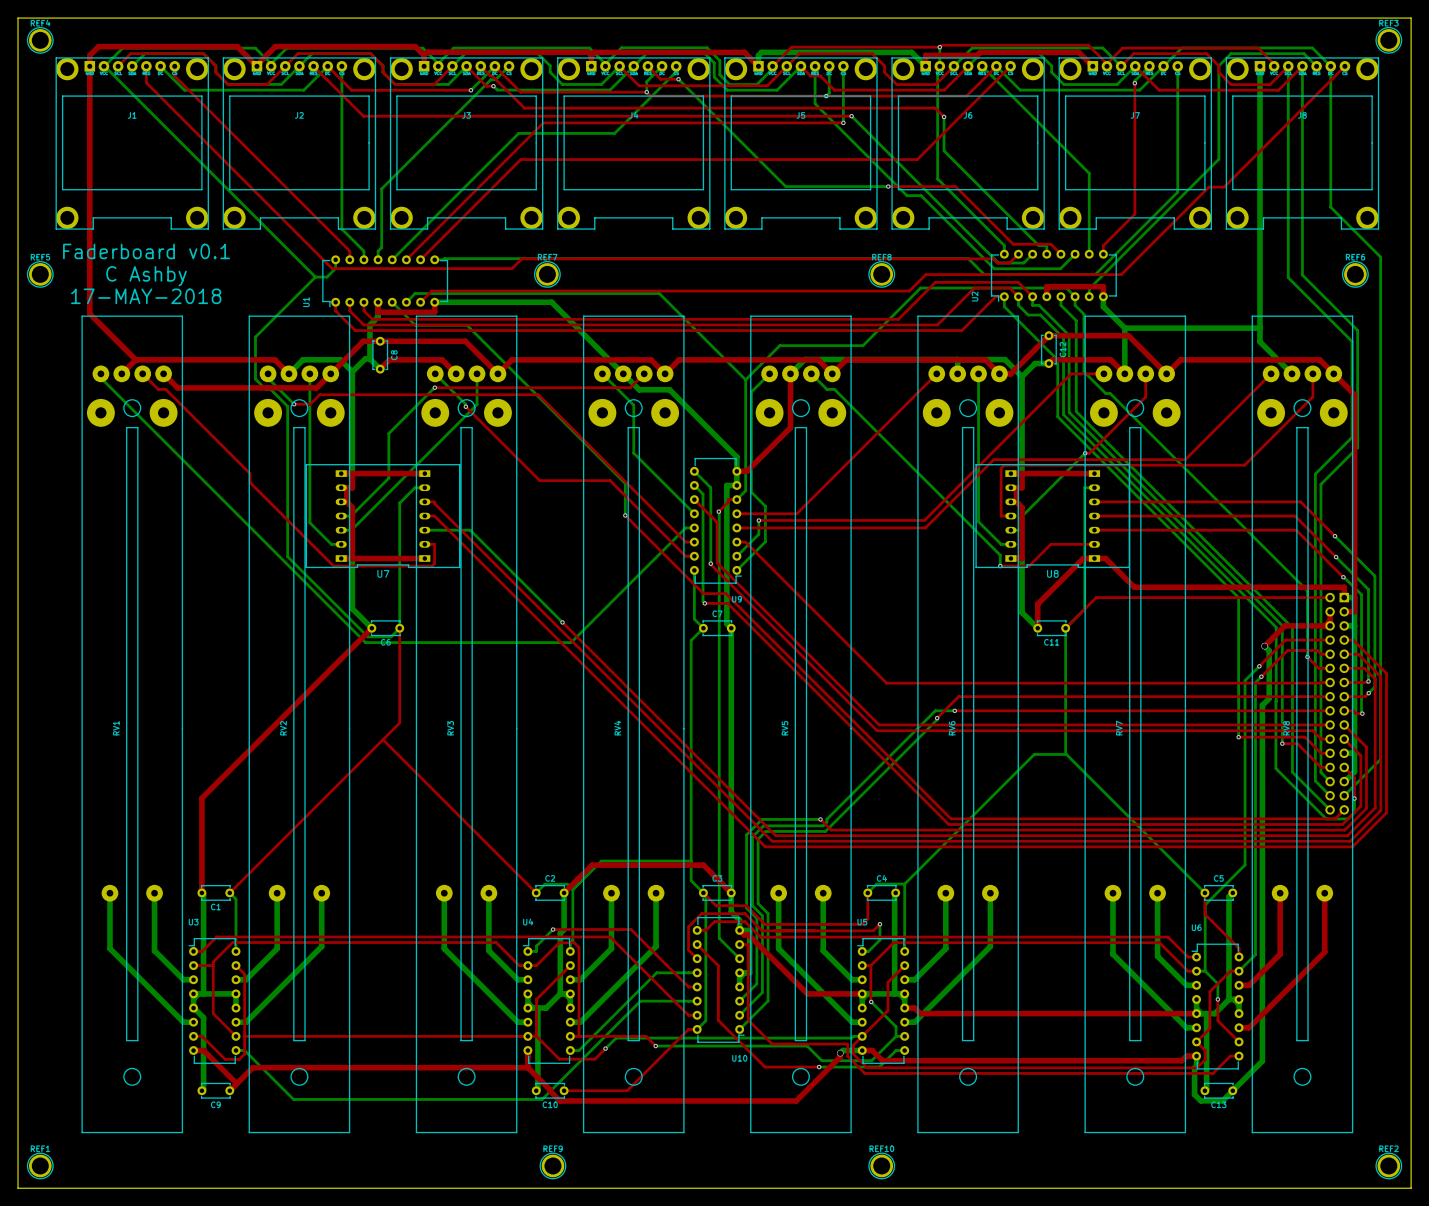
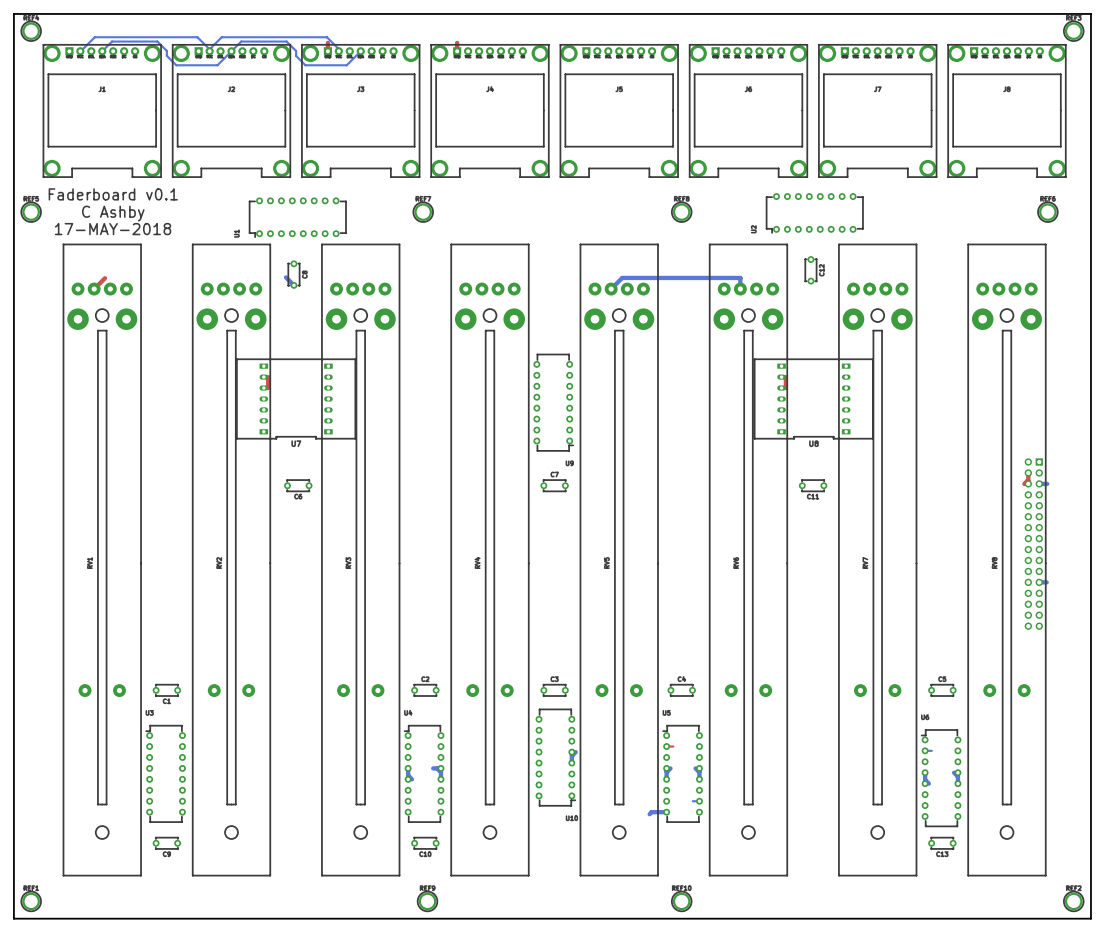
bottom track: (939, 47) (939, 66) (937, 68) (937, 178) (1004, 245) (1004, 254) -> none
via: (939, 47) -> none
bottom track: (605, 63) (621, 47) (706, 47) (719, 60) (719, 74) (729, 84) (756, 84) (772, 68) (772, 66) -> none
bottom track: (605, 63) (589, 48) (453, 48) (438, 63) (438, 66) -> none
top track: (1106, 63) (1122, 48) (1258, 48) (1274, 63) (1274, 66) -> none
top track: (1106, 63) (1088, 45) (941, 45) (939, 47) (791, 47) (772, 66) -> none
top track: (256, 65) (237, 46) (98, 46) (89, 55) (89, 313) (135, 359) (274, 359) (288, 373) -> none
top track: (256, 65) (275, 46) (415, 46) (424, 55) (427, 52) (588, 52) (591, 55) (594, 52) (744, 52) (758, 66) -> none
bottom track: (103, 66) (315, 277) -> none
top track: (118, 66) (130, 53) (203, 53) (215, 66) (215, 72) (228, 84) (266, 84) (298, 53) (370, 53) (383, 65) (383, 72) (395, 84) (434, 84) (452, 66) -> none
top track: (146, 66) (146, 82) (332, 268) (512, 268) (521, 258) (993, 258) (997, 263) (1009, 263) (1018, 254) -> none
bottom track: (160, 66) (184, 90) (303, 90) (327, 66) -> none
top track: (174, 66) (174, 76) (349, 251) (349, 259) -> none
top track: (313, 66) (363, 116) (851, 116) -> none
top track: (327, 66) (351, 90) (470, 90) -> none
bottom track: (341, 66) (341, 229) (363, 251) (363, 259) -> none
bottom track: (452, 66) (465, 53) (538, 53) (550, 65) (550, 72) (562, 84) (601, 84) (619, 66) -> none
top track: (466, 66) (486, 86) (493, 86) -> none
top track: (480, 66) (524, 108) (935, 108) (944, 116) -> none
top track: (494, 66) (520, 92) (646, 92) (650, 96) (966, 96) (996, 66) -> none
bottom track: (494, 66) (470, 90) -> none
bottom track: (509, 66) (495, 79) (490, 79) (381, 188) (381, 247) (378, 251) (378, 259) -> none
top track: (619, 66) (639, 85) (767, 85) (799, 53) (872, 53) (884, 65) (884, 72) (896, 84) (935, 84) (953, 66) -> none
top track: (647, 66) (660, 79) (678, 79) -> none
bottom track: (662, 66) (646, 81) (646, 92) -> none
bottom track: (676, 66) (676, 71) (614, 133) (518, 133) (392, 259) -> none
bottom track: (758, 66) (758, 55) (761, 52) (911, 52) (925, 66) -> none
top track: (800, 66) (810, 75) (820, 75) (834, 90) (944, 90) (968, 66) -> none
bottom track: (800, 66) (777, 90) (727, 90) (714, 77) (714, 63) (704, 53) (646, 53) (610, 90) (497, 90) (493, 86) -> none
bottom track: (815, 66) (815, 103) (906, 195) (921, 195) (994, 268) (1060, 268) (1075, 254) -> none
bottom track: (829, 66) (829, 93) (826, 96) -> none
bottom track: (843, 66) (843, 122) -> none
top track: (925, 66) (925, 55) (977, 55) (980, 52) (1078, 52) (1092, 66) -> none
bottom track: (953, 66) (972, 48) (1102, 48) (1121, 66) -> none
bottom track: (968, 66) (980, 53) (1039, 53) (1051, 65) (1051, 72) (1063, 84) (1117, 84) (1135, 66) -> none
bottom track: (982, 66) (1089, 173) (1089, 254) -> none
bottom track: (996, 66) (1020, 90) (1139, 90) (1181, 47) (1312, 47) (1330, 66) (1330, 207) (1380, 257) (1380, 759) (1344, 795) -> none
top track: (1010, 66) (917, 159) (520, 159) (420, 259) -> none
top track: (1121, 66) (1133, 53) (1206, 53) (1218, 65) (1218, 72) (1231, 84) (1269, 84) (1288, 66) -> none
top track: (1135, 66) (1159, 90) (1278, 90) (1302, 66) -> none
bottom track: (1149, 66) (1134, 80) (1134, 83) -> none
bottom track: (1177, 66) (1177, 192) (1095, 274) (984, 274) (968, 258) (434, 259) -> none
bottom track: (1259, 66) (1259, 341) (1292, 373) -> none
bottom track: (1288, 66) (1288, 277) (1352, 341) (1352, 437) (1315, 474) (1315, 781) (1330, 795) -> none
bottom track: (1302, 66) (1302, 275) (1357, 330) (1357, 447) (1320, 484) (1320, 772) (1330, 781) -> none
bottom track: (1316, 66) (1303, 53) (1231, 53) (1218, 65) (1218, 159) (1089, 288) (1089, 296) -> none
top track: (1344, 66) (1224, 187) (1208, 187) (1121, 274) (925, 274) (909, 291) (431, 291) (420, 302) -> none
bottom track: (678, 79) (785, 186) (888, 186) -> none
via: (678, 79) -> none
top track: (1134, 83) (1134, 214) (1103, 245) (1103, 254) -> none
via: (1134, 83) -> none
via: (493, 86) -> none
via: (470, 90) -> none
via: (646, 92) -> none
via: (826, 96) -> none
bottom track: (851, 116) (998, 263) (1023, 263) (1032, 254) -> none
via: (851, 116) -> none
bottom track: (944, 116) (944, 150) (1038, 245) (1046, 245) (1046, 254) -> none
via: (944, 116) -> none
top track: (843, 122) (543, 122) (406, 259) -> none
via: (843, 122) -> none
top track: (888, 186) (955, 186) (1013, 244) (1050, 244) (1060, 254) -> none
via: (888, 186) -> none
bottom track: (335, 259) (335, 268) (326, 277) (315, 277) -> none
bottom track: (315, 277) (255, 337) (255, 379) (265, 389) (270, 389) (287, 406) (287, 556) (367, 636) (391, 636) (399, 628) (399, 503) (415, 487) (424, 487) -> none
top track: (1004, 296) (995, 296) (961, 330) (355, 330) (335, 310) (335, 302) -> none
bottom track: (1004, 296) (1004, 306) (1057, 360) (1057, 416) (1238, 597) (1238, 737) -> none
top track: (1018, 296) (1009, 287) (974, 287) (937, 324) (363, 324) (349, 310) (349, 302) -> none
bottom track: (1018, 296) (1018, 305) (1028, 315) (1040, 315) (1063, 338) (1063, 414) (1276, 627) (1275, 768) (1326, 818) (1348, 818) (1354, 812) (1354, 798) -> none
top track: (1032, 296) (1018, 282) (935, 282) (898, 319) (372, 319) (363, 310) (363, 302) -> none
bottom track: (1032, 296) (1032, 305) (1039, 305) (1069, 335) (1069, 412) (1282, 625) (1282, 743) -> none
top track: (1046, 296) (1046, 286) (1103, 286) (1103, 296) -> none
bottom track: (1060, 296) (1060, 305) (1076, 320) (1076, 411) (1292, 627) (1292, 772) (1330, 809) -> none
bottom track: (1103, 296) (1103, 306) (1124, 328) -> none
top track: (378, 302) (378, 312) (434, 312) (434, 302) -> none
bottom track: (378, 302) (378, 316) (369, 325) (369, 358) (365, 358) (352, 371) -> none
bottom track: (392, 302) (415, 325) (467, 325) (625, 483) (625, 515) -> none
bottom track: (406, 302) (415, 293) (659, 293) (745, 379) -> none
bottom track: (434, 302) (551, 302) (639, 389) (669, 389) (736, 457) (736, 485) (726, 485) (726, 623) (731, 628) (731, 911) (739, 920) (739, 930) (749, 930) (749, 972) (739, 972) -> none
bottom track: (1124, 328) (1124, 373) -> none
bottom track: (1124, 328) (1259, 328) -> none
bottom track: (957, 359) (1005, 359) (1022, 376) -> none
top track: (1048, 363) (1052, 359) (1110, 359) (1124, 373) -> none
bottom track: (1048, 363) (1035, 363) (1022, 376) -> none
top track: (380, 369) (389, 359) (442, 359) (456, 373) -> none
bottom track: (352, 371) (352, 473) (341, 473) -> none
bottom track: (352, 371) (340, 359) (303, 359) (288, 373) -> none
bottom track: (100, 373) (100, 377) (365, 642) (571, 642) (685, 527) (694, 527) -> none
top track: (142, 373) (158, 389) (165, 389) (249, 473) (249, 482) (333, 566) (432, 566) (434, 563) (434, 544) (424, 544) -> none
top track: (163, 373) (177, 387) (316, 387) (363, 341) (465, 341) (497, 373) (511, 359) (651, 359) (665, 373) (679, 359) (818, 359) (832, 373) (846, 359) (985, 359) (999, 373) (1010, 373) (1048, 335) (1128, 335) (1166, 373) (1180, 359) (1319, 359) (1354, 394) (1354, 611) (1344, 611) -> none
bottom track: (268, 373) (268, 378) (294, 404) -> none
bottom track: (309, 373) (309, 522) (331, 544) (341, 544) -> none
bottom track: (435, 373) (465, 404) (465, 406) -> none
bottom track: (477, 373) (477, 404) (351, 530) (341, 530) -> none
bottom track: (602, 373) (633, 405) (633, 453) (694, 513) -> none
top track: (644, 373) (630, 387) (434, 387) -> none
bottom track: (769, 373) (751, 392) (751, 492) (765, 506) (765, 541) (736, 570) -> none
top track: (790, 373) (790, 427) (746, 471) (736, 471) -> none
bottom track: (811, 373) (826, 389) (834, 389) (1000, 555) (1000, 566) -> none
top track: (936, 373) (796, 513) (736, 513) -> none
bottom track: (978, 373) (978, 521) (1001, 544) (1010, 544) -> none
top track: (1103, 373) (1071, 373) (924, 520) (758, 520) -> none
top track: (1145, 373) (1145, 397) (1089, 453) (1085, 453) -> none
top track: (1271, 373) (1185, 459) (993, 459) (925, 527) (736, 527) -> none
top track: (1312, 373) (1312, 396) (1244, 465) (1004, 465) (1001, 468) (1001, 516) (1010, 516) -> none
bottom track: (1022, 376) (1022, 473) (1010, 473) -> none
bottom track: (745, 379) (779, 345) (863, 345) (920, 288) (1066, 288) (1075, 296) (1075, 305) (1083, 314) (1083, 371) (1105, 393) (1110, 393) (1307, 590) (1307, 657) -> none
bottom track: (745, 379) (745, 490) (736, 499) -> none
bottom track: (434, 387) (388, 433) (388, 478) (350, 516) (341, 516) -> none
via: (434, 387) -> none
top track: (294, 404) (310, 404) (319, 394) (538, 394) (685, 542) (694, 542) -> none
via: (294, 404) -> none
top track: (465, 406) (539, 480) (610, 480) (685, 556) (694, 556) -> none
via: (465, 406) -> none
bottom track: (1085, 453) (1020, 517) (1020, 530) (1010, 530) -> none
via: (1085, 453) -> none
bottom track: (694, 471) (710, 487) (710, 563) -> none
top track: (341, 473) (424, 473) -> none
top track: (352, 473) (352, 487) (341, 487) -> none
top track: (1010, 473) (1094, 473) -> none
top track: (1022, 473) (1022, 487) (1010, 487) -> none
bottom track: (694, 485) (703, 494) (703, 601) (704, 603) -> none
bottom track: (1094, 487) (1084, 487) (1084, 609) (1065, 628) (1065, 754) -> none
top track: (694, 499) (717, 522) (717, 563) (879, 724) (1330, 724) -> none
top track: (736, 499) (728, 499) (728, 502) (718, 511) -> none
top track: (341, 501) (346, 501) (352, 507) (352, 558) -> none
top track: (424, 501) (434, 501) (772, 841) (1350, 841) (1380, 810) (1380, 676) (1358, 654) (1344, 654) -> none
top track: (1010, 501) (1016, 501) (1022, 507) (1022, 558) (1010, 558) -> none
top track: (1094, 501) (1300, 501) (1334, 536) -> none
bottom track: (718, 511) (719, 938) (739, 958) -> none
via: (718, 511) -> none
top track: (625, 515) (703, 593) (725, 593) (951, 818) (1335, 818) (1344, 809) -> none
via: (625, 515) -> none
top track: (424, 516) (434, 516) (765, 846) (1352, 846) (1386, 812) (1386, 673) (1353, 640) (1344, 640) -> none
top track: (1094, 516) (1295, 516) (1336, 557) -> none
bottom track: (758, 520) (758, 534) (736, 556) -> none
via: (758, 520) -> none
bottom track: (424, 530) (470, 530) (562, 622) -> none
top track: (1094, 530) (1296, 530) (1343, 577) -> none
bottom track: (1334, 536) (1374, 576) (1374, 686) (1368, 693) -> none
via: (1334, 536) -> none
top track: (736, 542) (745, 542) (886, 683) (1330, 682) -> none
top track: (1094, 544) (1050, 544) (1029, 566) (1000, 566) -> none
bottom track: (1336, 557) (1368, 589) (1368, 681) -> none
via: (1336, 557) -> none
top track: (341, 558) (424, 558) -> none
bottom track: (341, 558) (352, 558) (352, 608) (371, 628) -> none
bottom track: (1010, 558) (1022, 558) (1022, 612) (1037, 628) -> none
top track: (710, 563) (877, 730) (1312, 730) (1321, 739) (1330, 739) -> none
via: (710, 563) -> none
via: (1000, 566) -> none
bottom track: (694, 570) (694, 619) (703, 628) (691, 640) (691, 880) (705, 895) (705, 1020) (697, 1029) -> none
bottom track: (1343, 577) (1361, 594) (1362, 713) -> none
via: (1343, 577) -> none
top track: (1330, 597) (1096, 597) (1065, 628) -> none
top track: (1344, 597) (1344, 587) (1134, 587) (1105, 558) (1083, 558) (1037, 604) (1037, 628) -> none
bottom track: (1344, 597) (1354, 597) (1354, 771) (1344, 781) -> none
top track: (704, 603) (727, 603) (948, 824) (1342, 824) (1360, 806) (1360, 755) (1344, 739) -> none
via: (704, 603) -> none
top track: (562, 622) (775, 835) (1347, 835) (1375, 807) (1375, 679) (1364, 668) (1344, 668) -> none
via: (562, 622) -> none
top track: (1330, 625) (1284, 625) (1264, 646) -> none
top track: (371, 628) (201, 798) (201, 892) -> none
top track: (399, 628) (399, 722) (229, 892) -> none
top track: (1330, 640) (1285, 640) (1259, 666) -> none
bottom track: (1264, 646) (1269, 650) (1269, 698) (1262, 705) (1262, 1061) (1222, 1100) (1200, 1100) (1194, 1094) (1196, 1056) -> none
via: (1264, 646) -> none
top track: (1330, 654) (1321, 654) (1317, 650) (1287, 650) (1261, 676) -> none
top track: (1307, 657) (1318, 668) (1330, 668) -> none
via: (1307, 657) -> none
bottom track: (1259, 666) (1245, 680) (1245, 865) (1205, 904) (1205, 971) (1217, 983) (1217, 999) -> none
via: (1259, 666) -> none
bottom track: (1261, 676) (1255, 682) (1255, 954) (1239, 971) -> none
via: (1261, 676) -> none
top track: (1368, 681) (1344, 682) -> none
via: (1368, 681) -> none
top track: (1368, 693) (1365, 696) (1344, 696) -> none
via: (1368, 693) -> none
top track: (1330, 696) (958, 696) (937, 718) -> none
top track: (954, 710) (1330, 710) -> none
bottom track: (954, 710) (935, 710) (826, 819) (823, 825) (763, 825) (752, 836) (752, 905) (762, 915) (762, 992) (739, 1015) -> none
via: (954, 710) -> none
top track: (1344, 710) (1362, 713) -> none
via: (1362, 713) -> none
bottom track: (937, 718) (825, 831) (765, 831) (758, 839) (758, 903) (768, 913) (768, 1001) (739, 1029) -> none
via: (937, 718) -> none
top track: (1344, 724) (1366, 747) (1366, 808) (1344, 830) (831, 830) (820, 819) -> none
top track: (1238, 737) (1305, 737) (1321, 753) (1330, 753) -> none
via: (1238, 737) -> none
top track: (383, 739) (536, 892) -> none
top track: (1282, 743) (1297, 743) (1321, 767) (1330, 767) -> none
via: (1282, 743) -> none
top track: (1344, 767) (1354, 777) (1354, 798) -> none
via: (1354, 798) -> none
bottom track: (820, 819) (762, 819) (746, 834) (746, 908) (756, 918) (756, 983) (739, 1001) -> none
via: (820, 819) -> none
bottom track: (691, 861) (601, 861) (572, 889) -> none
bottom track: (904, 884) (904, 951) -> none
bottom track: (904, 884) (876, 884) (867, 892) -> none
bottom track: (904, 884) (1034, 754) (1066, 754) (1204, 892) -> none
bottom track: (572, 889) (572, 940) (570, 942) (570, 951) -> none
bottom track: (572, 889) (567, 884) (544, 884) (536, 892) -> none
bottom track: (201, 892) (203, 894) (203, 993) -> none
bottom track: (229, 892) (236, 899) (236, 951) -> none
top track: (564, 892) (592, 865) (703, 865) (731, 892) -> none
bottom track: (564, 892) (564, 929) (560, 933) (560, 993) (546, 1008) (527, 1008) -> none
top track: (703, 892) (716, 905) (746, 905) (765, 924) (862, 924) (867, 918) (867, 892) -> none
bottom track: (895, 892) (894, 993) -> none
top track: (1204, 892) (1204, 914) (1239, 948) (1239, 957) -> none
bottom track: (1232, 892) (1229, 896) (1229, 999) -> none
bottom track: (109, 893) (109, 948) (183, 1022) (193, 1022) -> none
bottom track: (154, 893) (154, 950) (183, 979) (193, 979) -> none
bottom track: (277, 893) (277, 948) (246, 979) (236, 979) -> none
bottom track: (321, 893) (321, 946) (246, 1022) (236, 1022) -> none
bottom track: (444, 893) (444, 948) (517, 1022) (527, 1022) -> none
bottom track: (488, 893) (488, 950) (517, 979) (527, 979) -> none
bottom track: (611, 893) (611, 948) (580, 979) (570, 979) -> none
bottom track: (656, 893) (656, 946) (580, 1022) (570, 1022) -> none
bottom track: (778, 893) (778, 948) (852, 1022) (862, 1022) -> none
bottom track: (823, 893) (823, 950) (852, 979) (862, 979) -> none
bottom track: (945, 893) (945, 948) (914, 979) (904, 979) -> none
bottom track: (990, 893) (990, 946) (914, 1022) (904, 1022) -> none
bottom track: (1112, 893) (1112, 954) (1186, 1027) (1196, 1027) -> none
bottom track: (1157, 893) (1157, 956) (1186, 985) (1196, 985) -> none
top track: (1280, 893) (1280, 954) (1249, 985) (1239, 985) -> none
top track: (1324, 893) (1324, 952) (1249, 1027) (1239, 1027) -> none
top track: (879, 924) (873, 930) (762, 930) (745, 913) (701, 913) (688, 926) (688, 950) (697, 958) -> none
bottom track: (879, 924) (880, 939) (868, 951) (862, 951) -> none
via: (879, 924) -> none
top track: (553, 929) (631, 929) (688, 986) (697, 986) -> none
bottom track: (553, 929) (536, 946) (536, 951) (527, 951) -> none
via: (553, 929) -> none
top track: (697, 930) (705, 930) (714, 921) (745, 921) (760, 937) (1168, 937) (1187, 957) (1196, 957) -> none
top track: (739, 930) (744, 934) (748, 934) (807, 993) (862, 993) -> none
top track: (697, 944) (718, 965) (718, 1020) (764, 1067) (819, 1067) -> none
top track: (739, 944) (748, 944) (748, 1020) (772, 1044) (847, 1044) (847, 1056) (864, 1073) (1213, 1073) (1230, 1056) (1239, 1056) -> none
top track: (193, 951) (202, 951) (216, 936) (610, 936) (688, 1015) (697, 1015) -> none
top track: (193, 965) (213, 965) -> none
top track: (236, 965) (244, 974) (244, 1054) (239, 1059) (225, 1059) (202, 1036) (193, 1036) -> none
top track: (570, 965) (536, 999) (536, 1036) -> none
top track: (904, 965) (887, 982) (887, 1010) (853, 1045) (853, 1053) (867, 1067) (1197, 1067) (1205, 1059) (1205, 1050) (1196, 1041) (1209, 1028) (1209, 991) (1230, 971) (1239, 971) -> none
top track: (1196, 971) (1187, 971) (1159, 942) (893, 942) (870, 965) (871, 1001) -> none
bottom track: (697, 972) (656, 972) (578, 1050) (570, 1050) -> none
bottom track: (193, 993) (236, 993) (236, 1008) -> none
bottom track: (198, 993) (193, 998) (193, 1008) (203, 1017) (203, 1089) (201, 1090) -> none
bottom track: (862, 993) (904, 993) -> none
top track: (1217, 999) (1217, 1020) (1239, 1041) -> none
via: (1217, 999) -> none
bottom track: (1229, 999) (1214, 1013) (1196, 1013) -> none
bottom track: (697, 1001) (640, 1001) (542, 1099) (293, 1099) (244, 1050) (236, 1050) -> none
bottom track: (871, 1001) (896, 1026) (896, 1036) (871, 1060) (821, 1060) (807, 1046) (655, 1046) -> none
via: (871, 1001) -> none
bottom track: (537, 1008) (537, 1089) (536, 1090) -> none
top track: (904, 1008) (914, 1008) (920, 1013) (1196, 1013) -> none
bottom track: (1206, 1013) (1206, 1089) (1204, 1090) -> none
top track: (697, 1029) (688, 1029) (627, 1090) (564, 1090) -> none
top track: (236, 1036) (213, 1013) (213, 961) (232, 942) (496, 942) (519, 965) (536, 965) (559, 942) (574, 942) (578, 947) (578, 1036) -> none
top track: (244, 1036) (536, 1036) -> none
top track: (536, 1036) (559, 1059) (594, 1059) (605, 1048) -> none
top track: (570, 1036) (646, 1036) (655, 1046) -> none
bottom track: (862, 1036) (851, 1038) (616, 1038) (605, 1048) -> none
via: (655, 1046) -> none
via: (605, 1048) -> none
top track: (193, 1050) (203, 1050) (236, 1083) -> none
top track: (527, 1050) (527, 1067) -> none
top track: (862, 1050) (872, 1050) (882, 1060) (1181, 1060) (1186, 1056) (1196, 1056) -> none
bottom track: (904, 1050) (896, 1050) (879, 1067) (819, 1067) -> none
top track: (840, 1053) (840, 1056) (796, 1100) (559, 1100) (527, 1067) -> none
via: (840, 1053) -> none
top track: (527, 1067) (252, 1067) (229, 1090) -> none
via: (819, 1067) -> none

